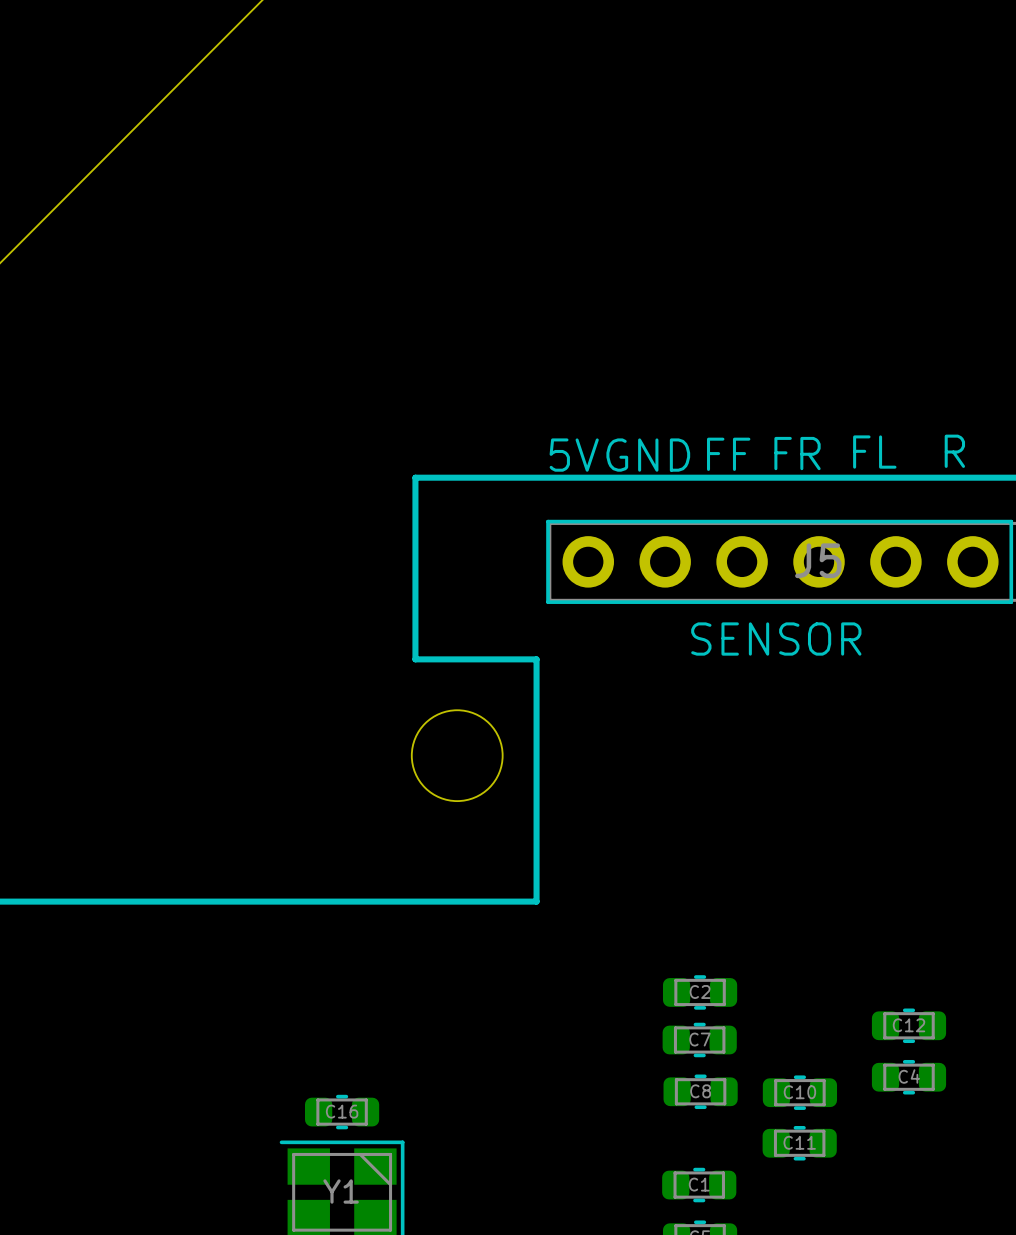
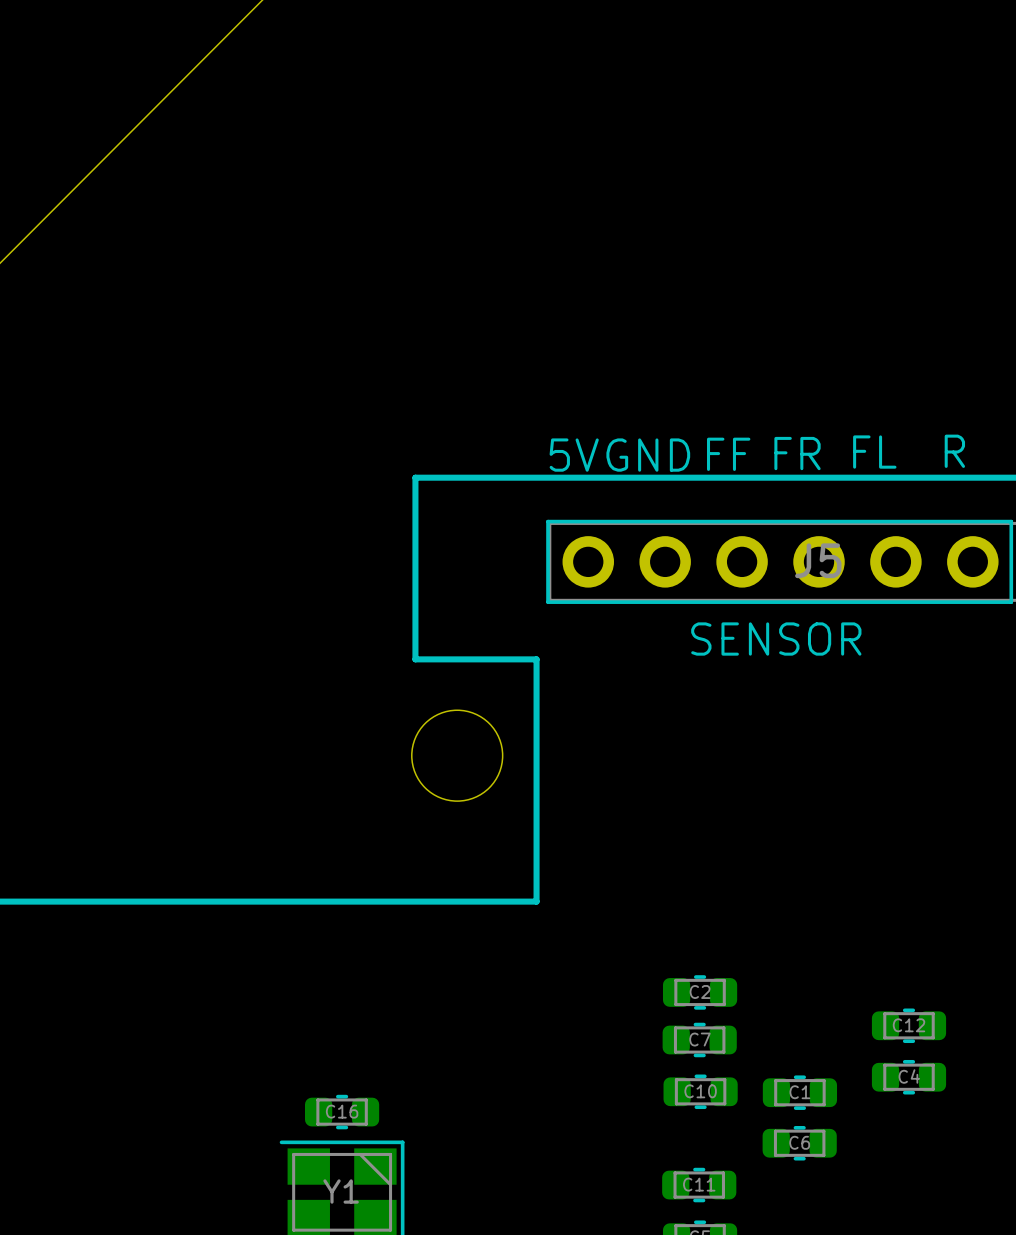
C8 name: C8 (700, 1091) -> C10 (700, 1091)
C10 name: C10 (799, 1092) -> C1 (799, 1092)
C11 name: C11 (799, 1142) -> C6 (799, 1142)
C1 name: C1 (699, 1184) -> C11 (699, 1184)

